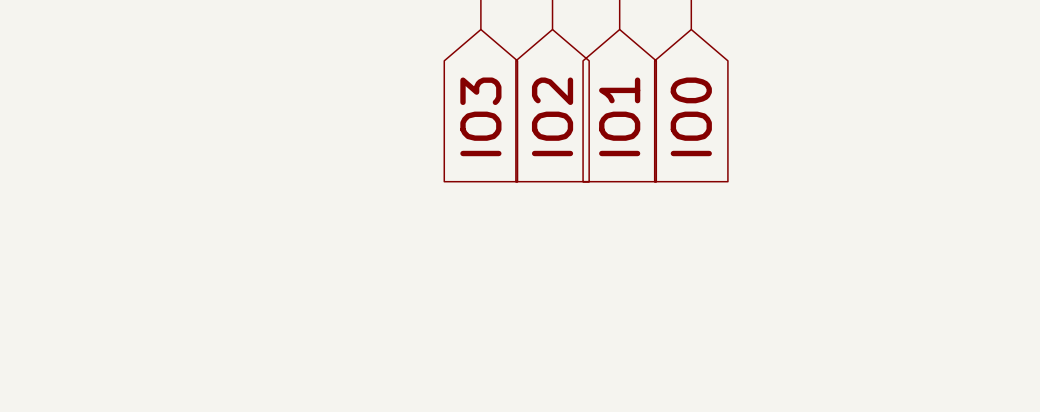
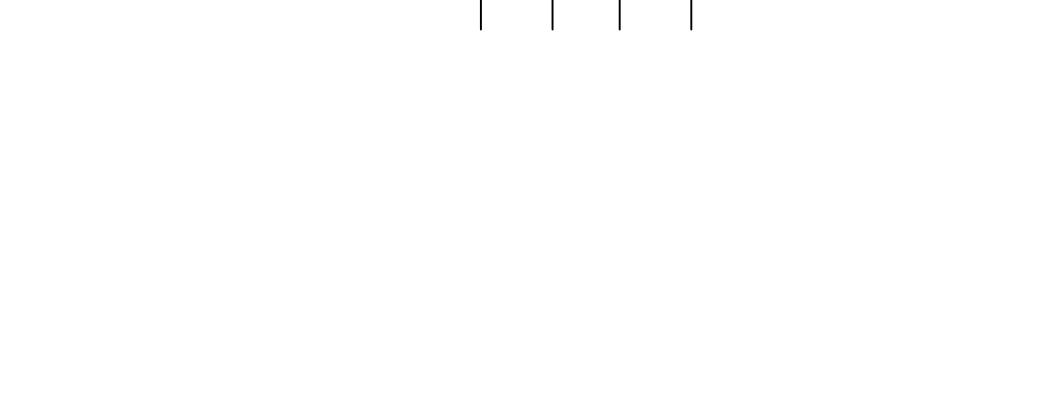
global label: IO3 (480, 116) -> none
global label: IO2 (552, 116) -> none
global label: IO1 (619, 116) -> none
global label: IO0 (691, 116) -> none

